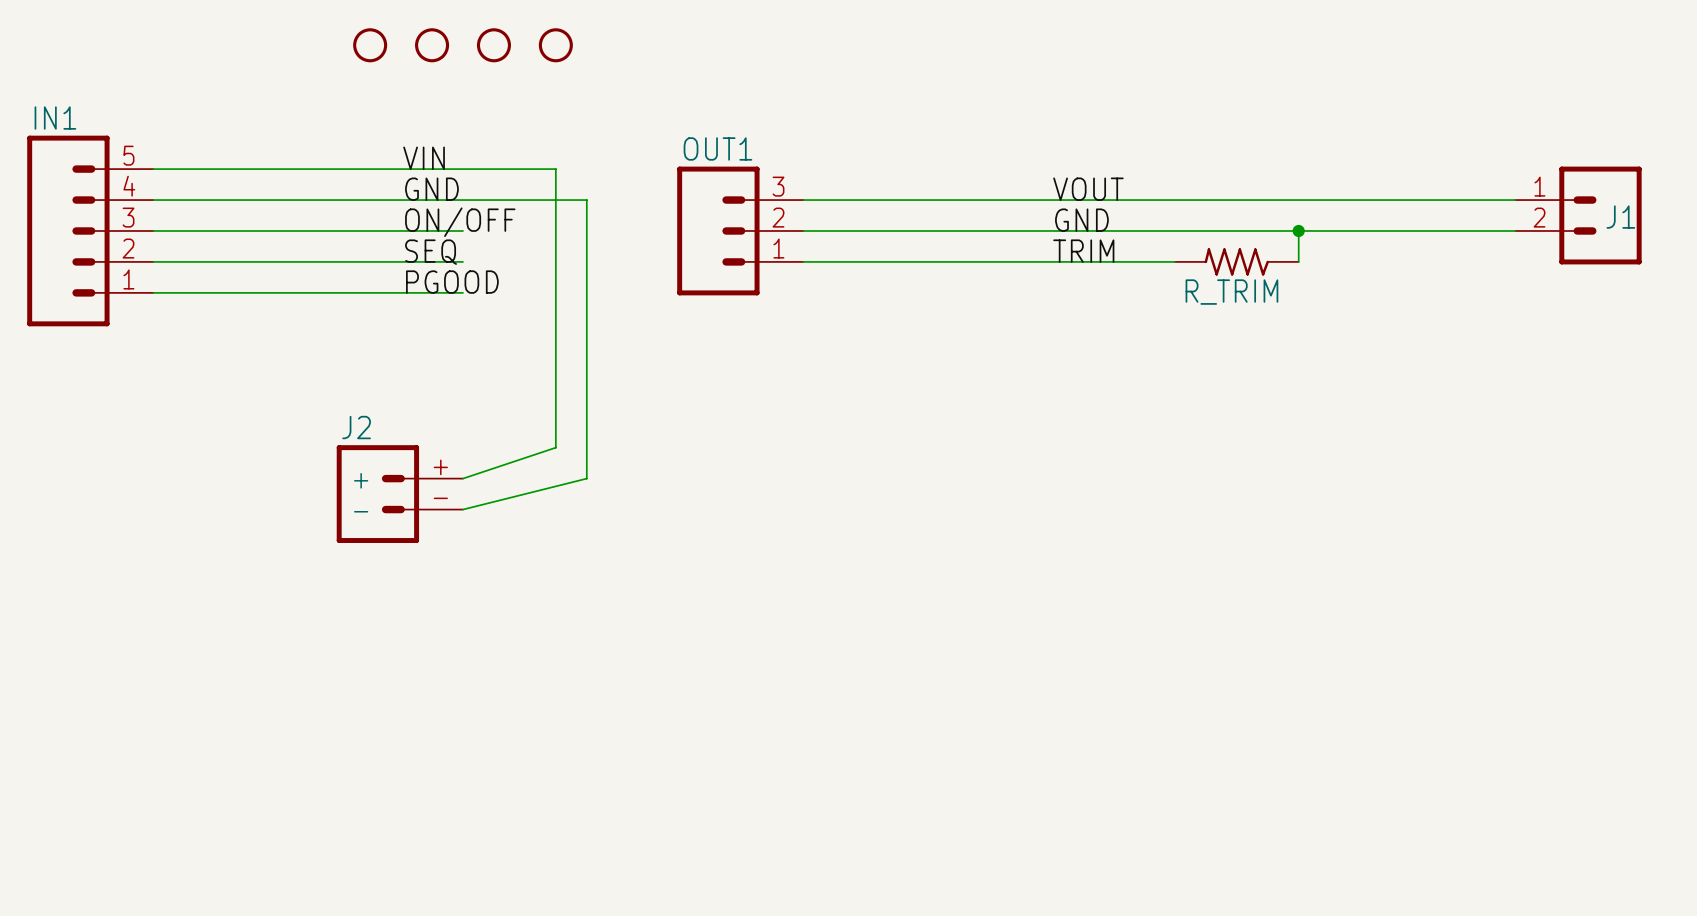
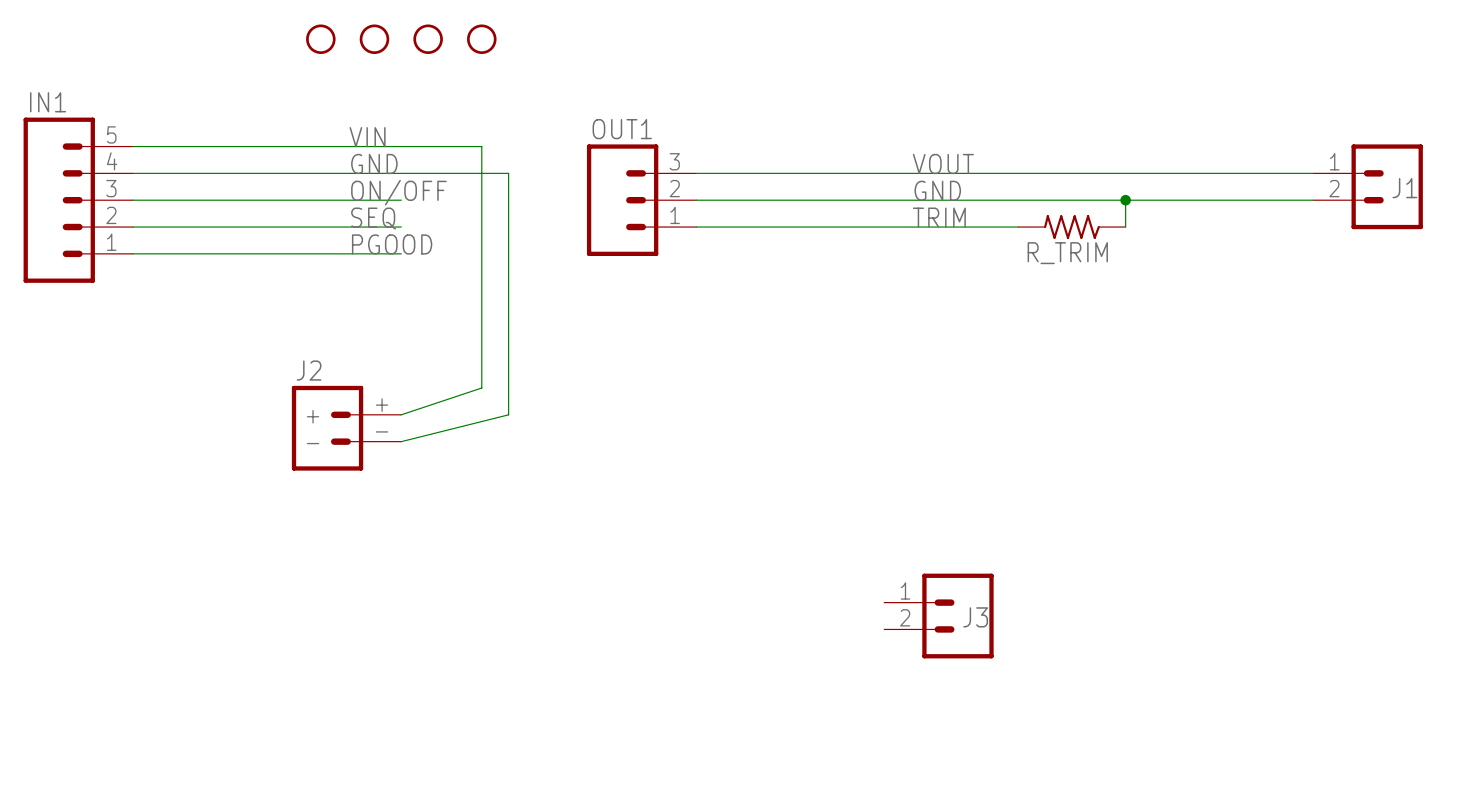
J3: none -> (938, 616)

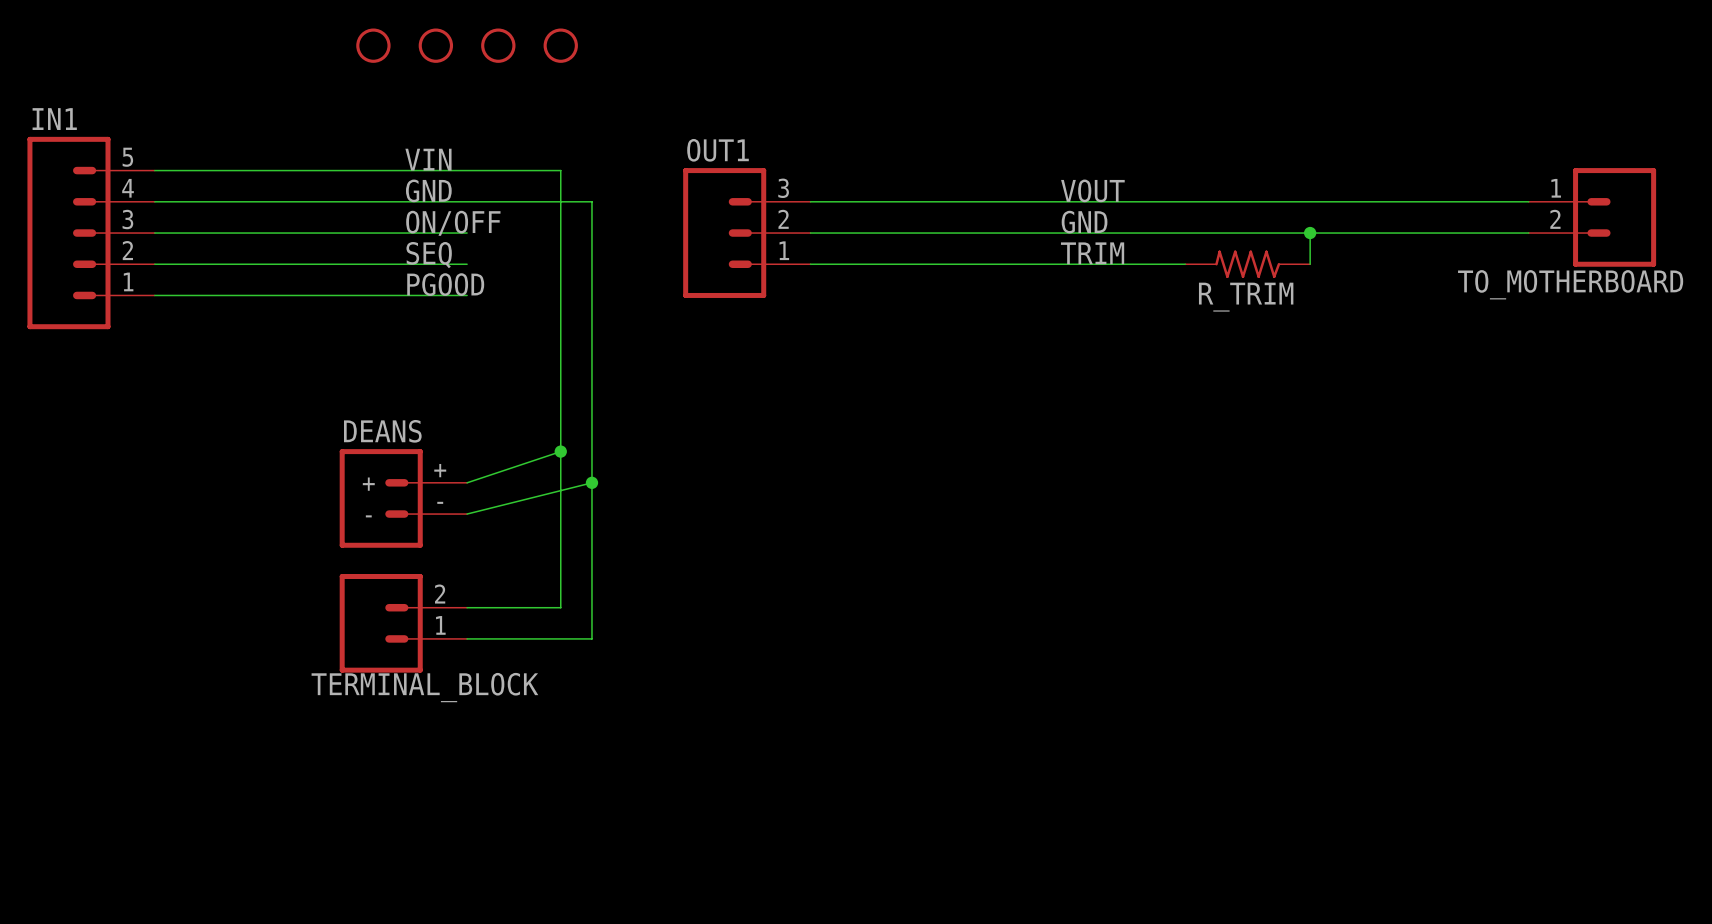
J1 name: J1 (1404, 188) -> TO_MOTHERBOARD (1570, 284)
J2 name: J2 (309, 370) -> DEANS (382, 431)
wire: none -> (560, 451) (560, 607) (467, 607)
junction: none -> (560, 451)
wire: none -> (591, 482) (591, 638) (467, 638)
junction: none -> (591, 482)
TERMINAL_BLOCK: none -> (403, 623)
J3: (938, 616) -> none

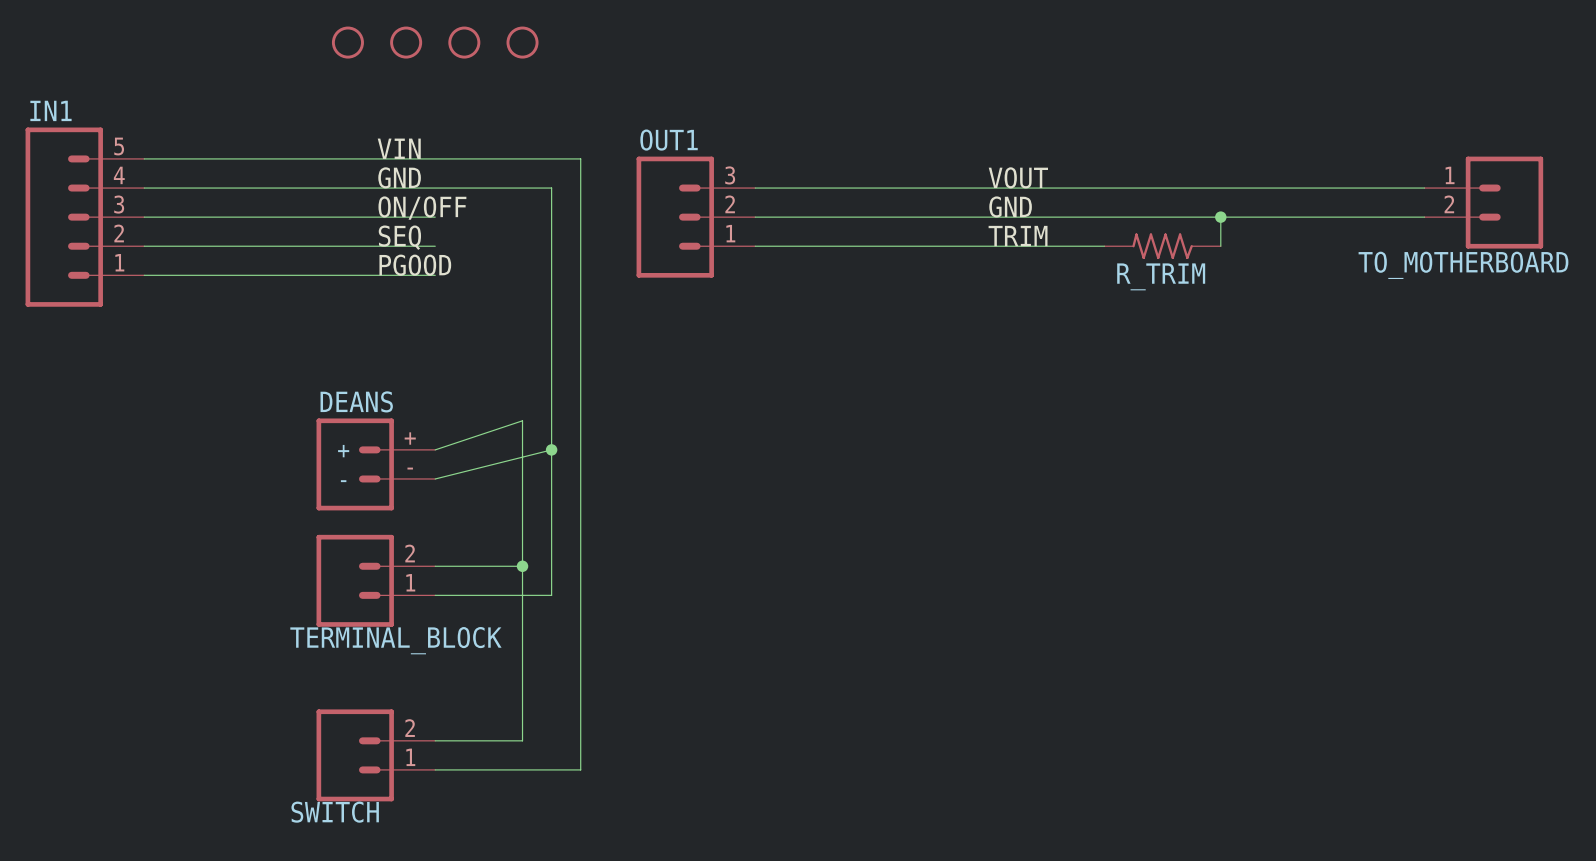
wire: (560, 170) (560, 451) -> (522, 158) (580, 158) (580, 769) (435, 769)
junction: (560, 451) -> none
wire: none -> (522, 566) (522, 740) (435, 740)
junction: none -> (522, 566)
SWITCH: none -> (375, 755)

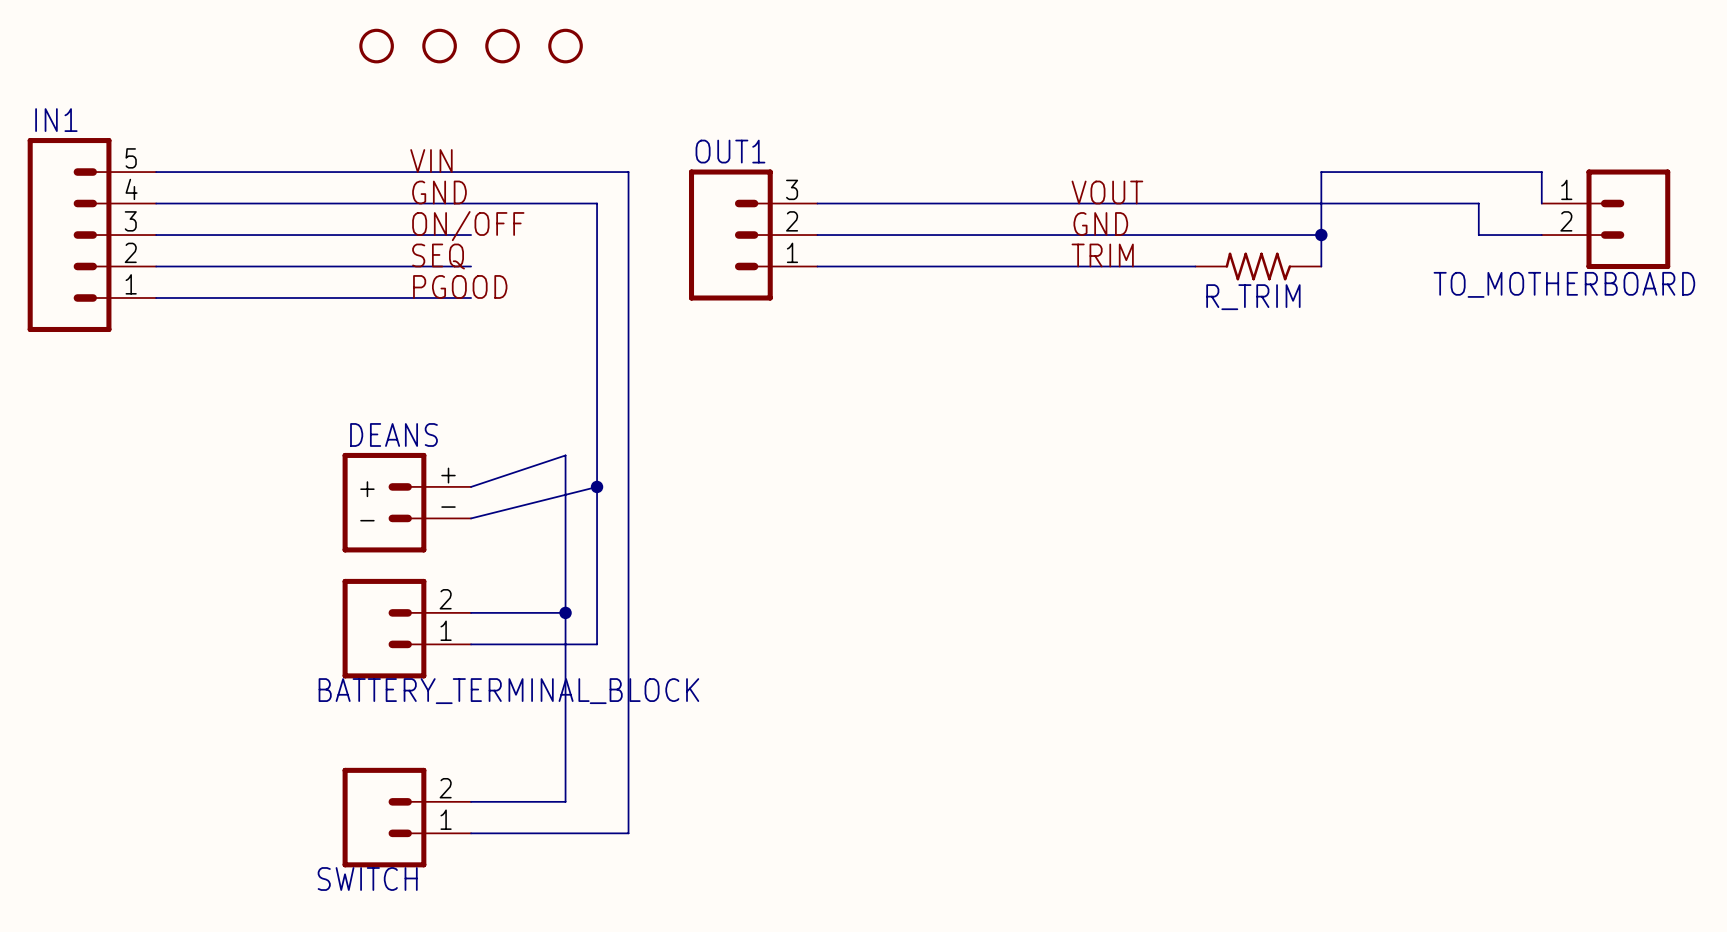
wire: (1366, 188) (1424, 188) -> (1478, 203) (1478, 235)
wire: (1220, 217) (1366, 217) -> (1321, 235) (1321, 172) (1541, 172) (1541, 203)
TERMINAL_BLOCK name: TERMINAL_BLOCK (395, 640) -> BATTERY_TERMINAL_BLOCK (508, 691)

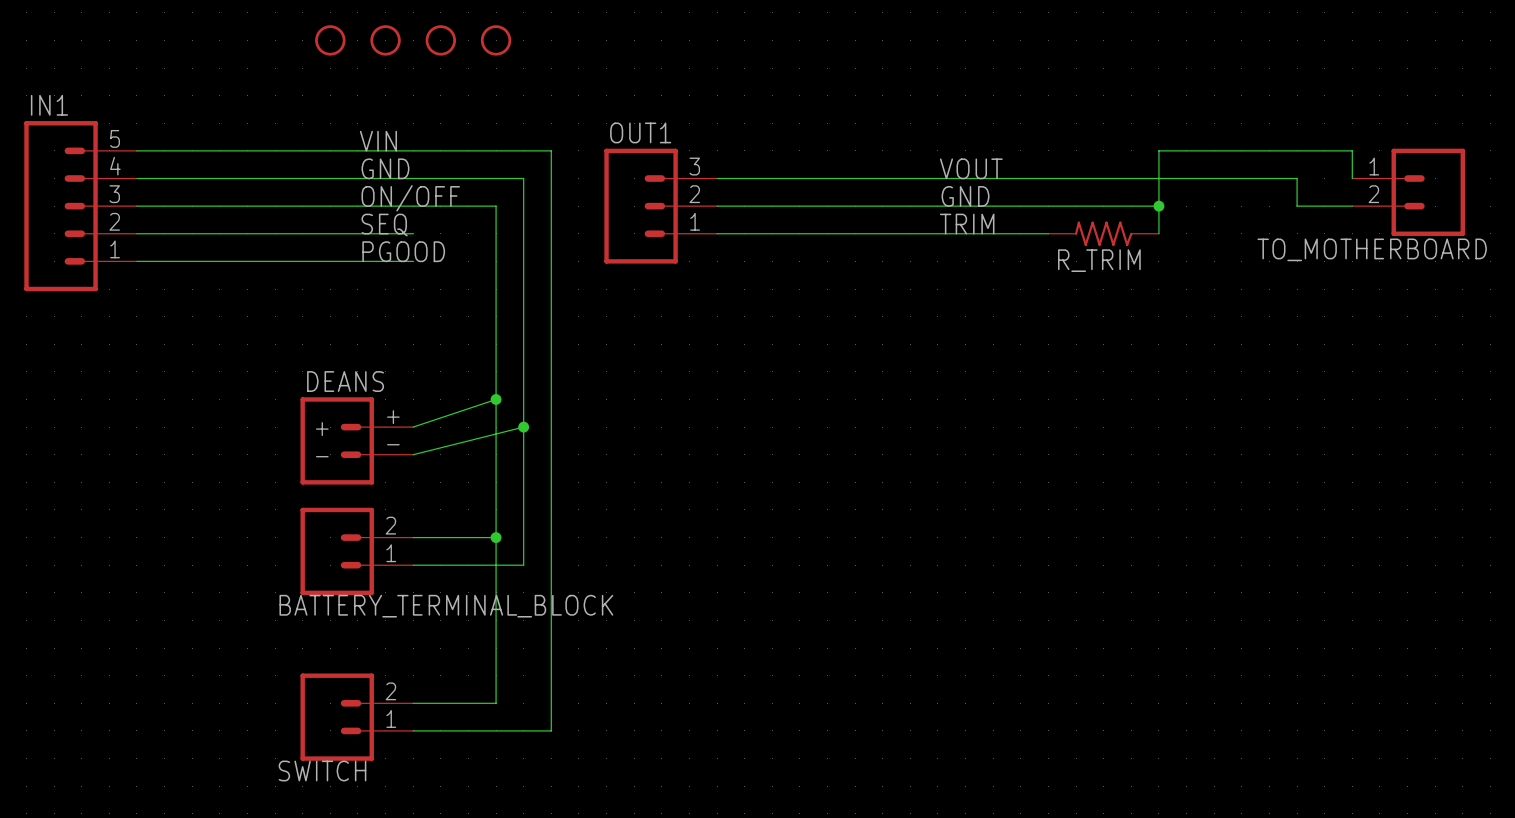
wire: none -> (413, 206) (496, 206) (496, 399)
junction: none -> (496, 399)

